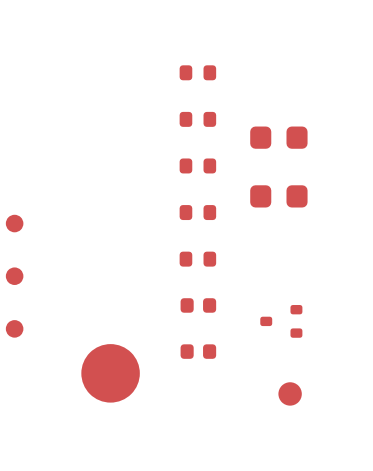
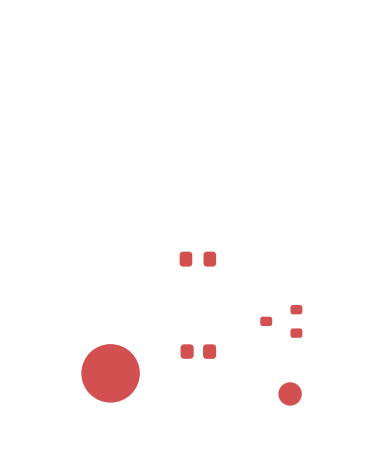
part: (197, 72) -> none
part: (197, 119) -> none
part: (278, 137) -> none
part: (197, 165) -> none
part: (278, 196) -> none
part: (197, 212) -> none
part: (14, 223) -> none
part: (14, 276) -> none
part: (198, 305) -> none
part: (14, 328) -> none

